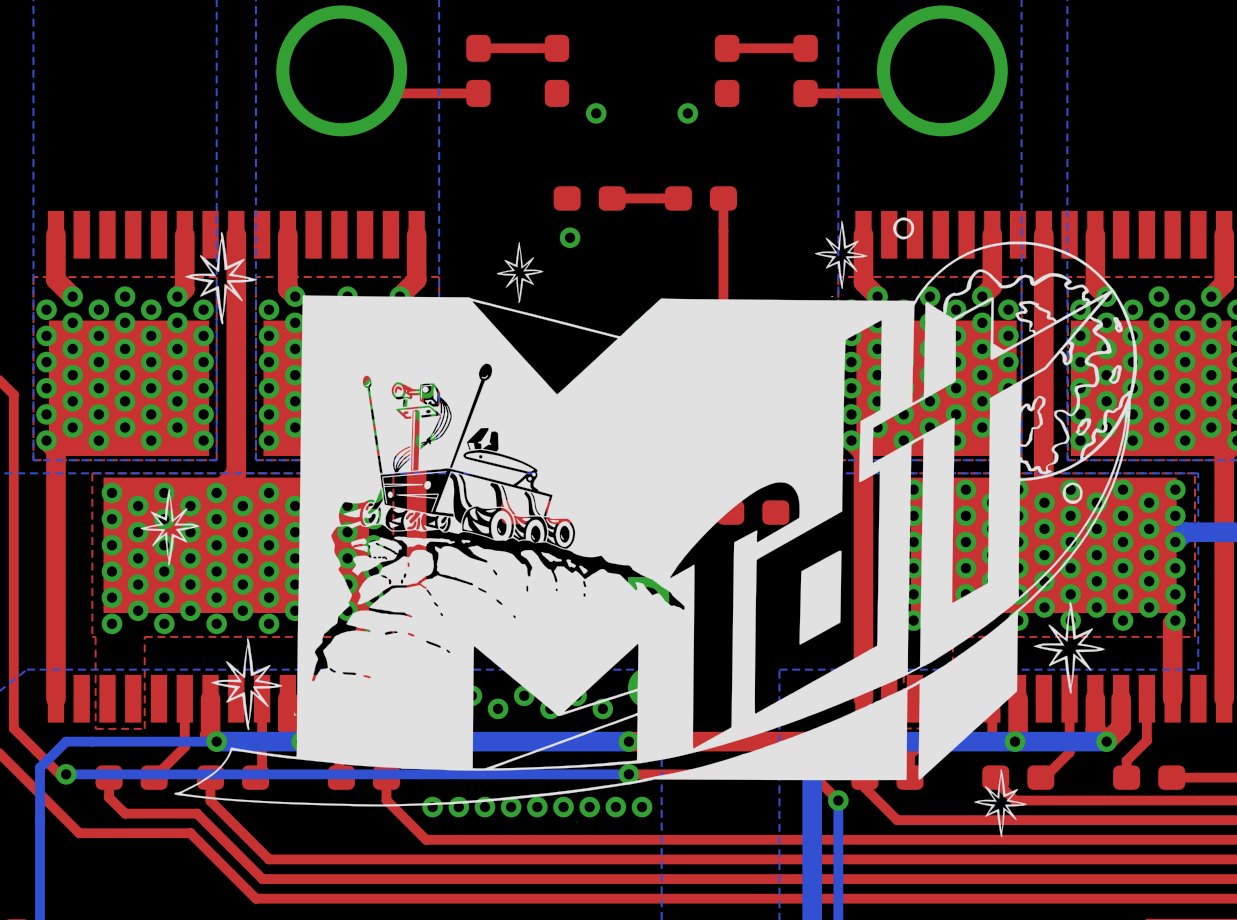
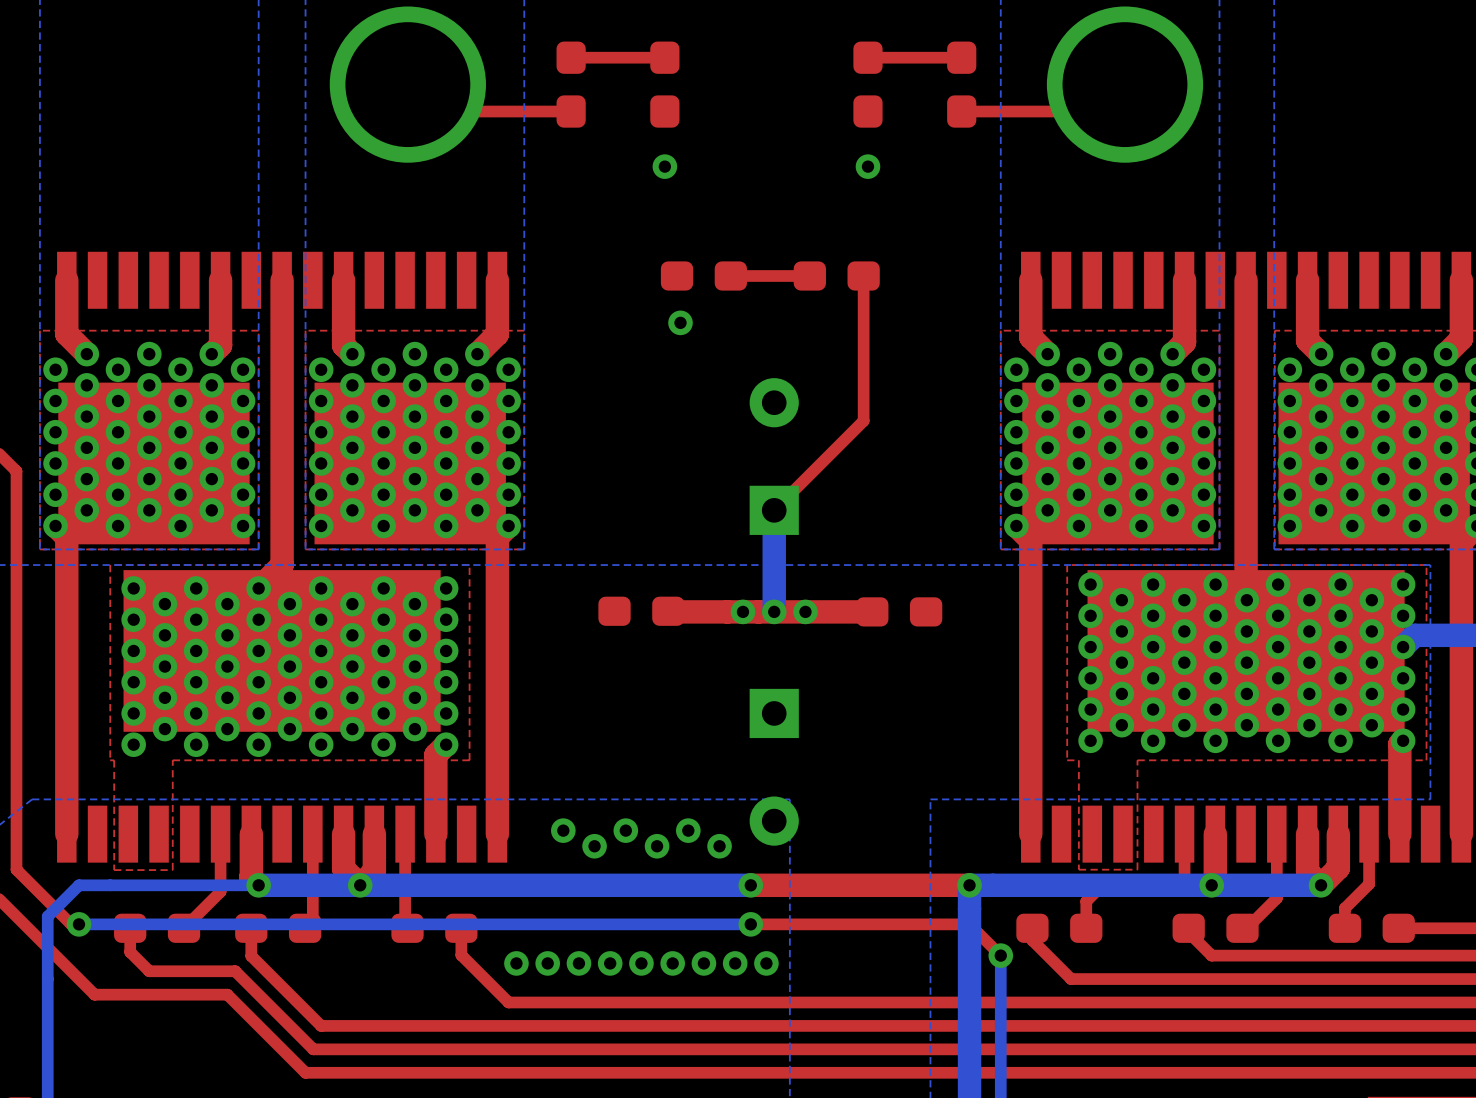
via position: (596, 113) -> (664, 166)
via position: (687, 113) -> (867, 166)
part position: (589, 198) -> (703, 275)
top track: (678, 198) (612, 198) -> (809, 275) (730, 275)
part position: (700, 198) -> (836, 275)
top track: (723, 198) (723, 231) -> none
drawing: [140, 217, 1138, 838] -> none
via position: (570, 237) -> (680, 322)

